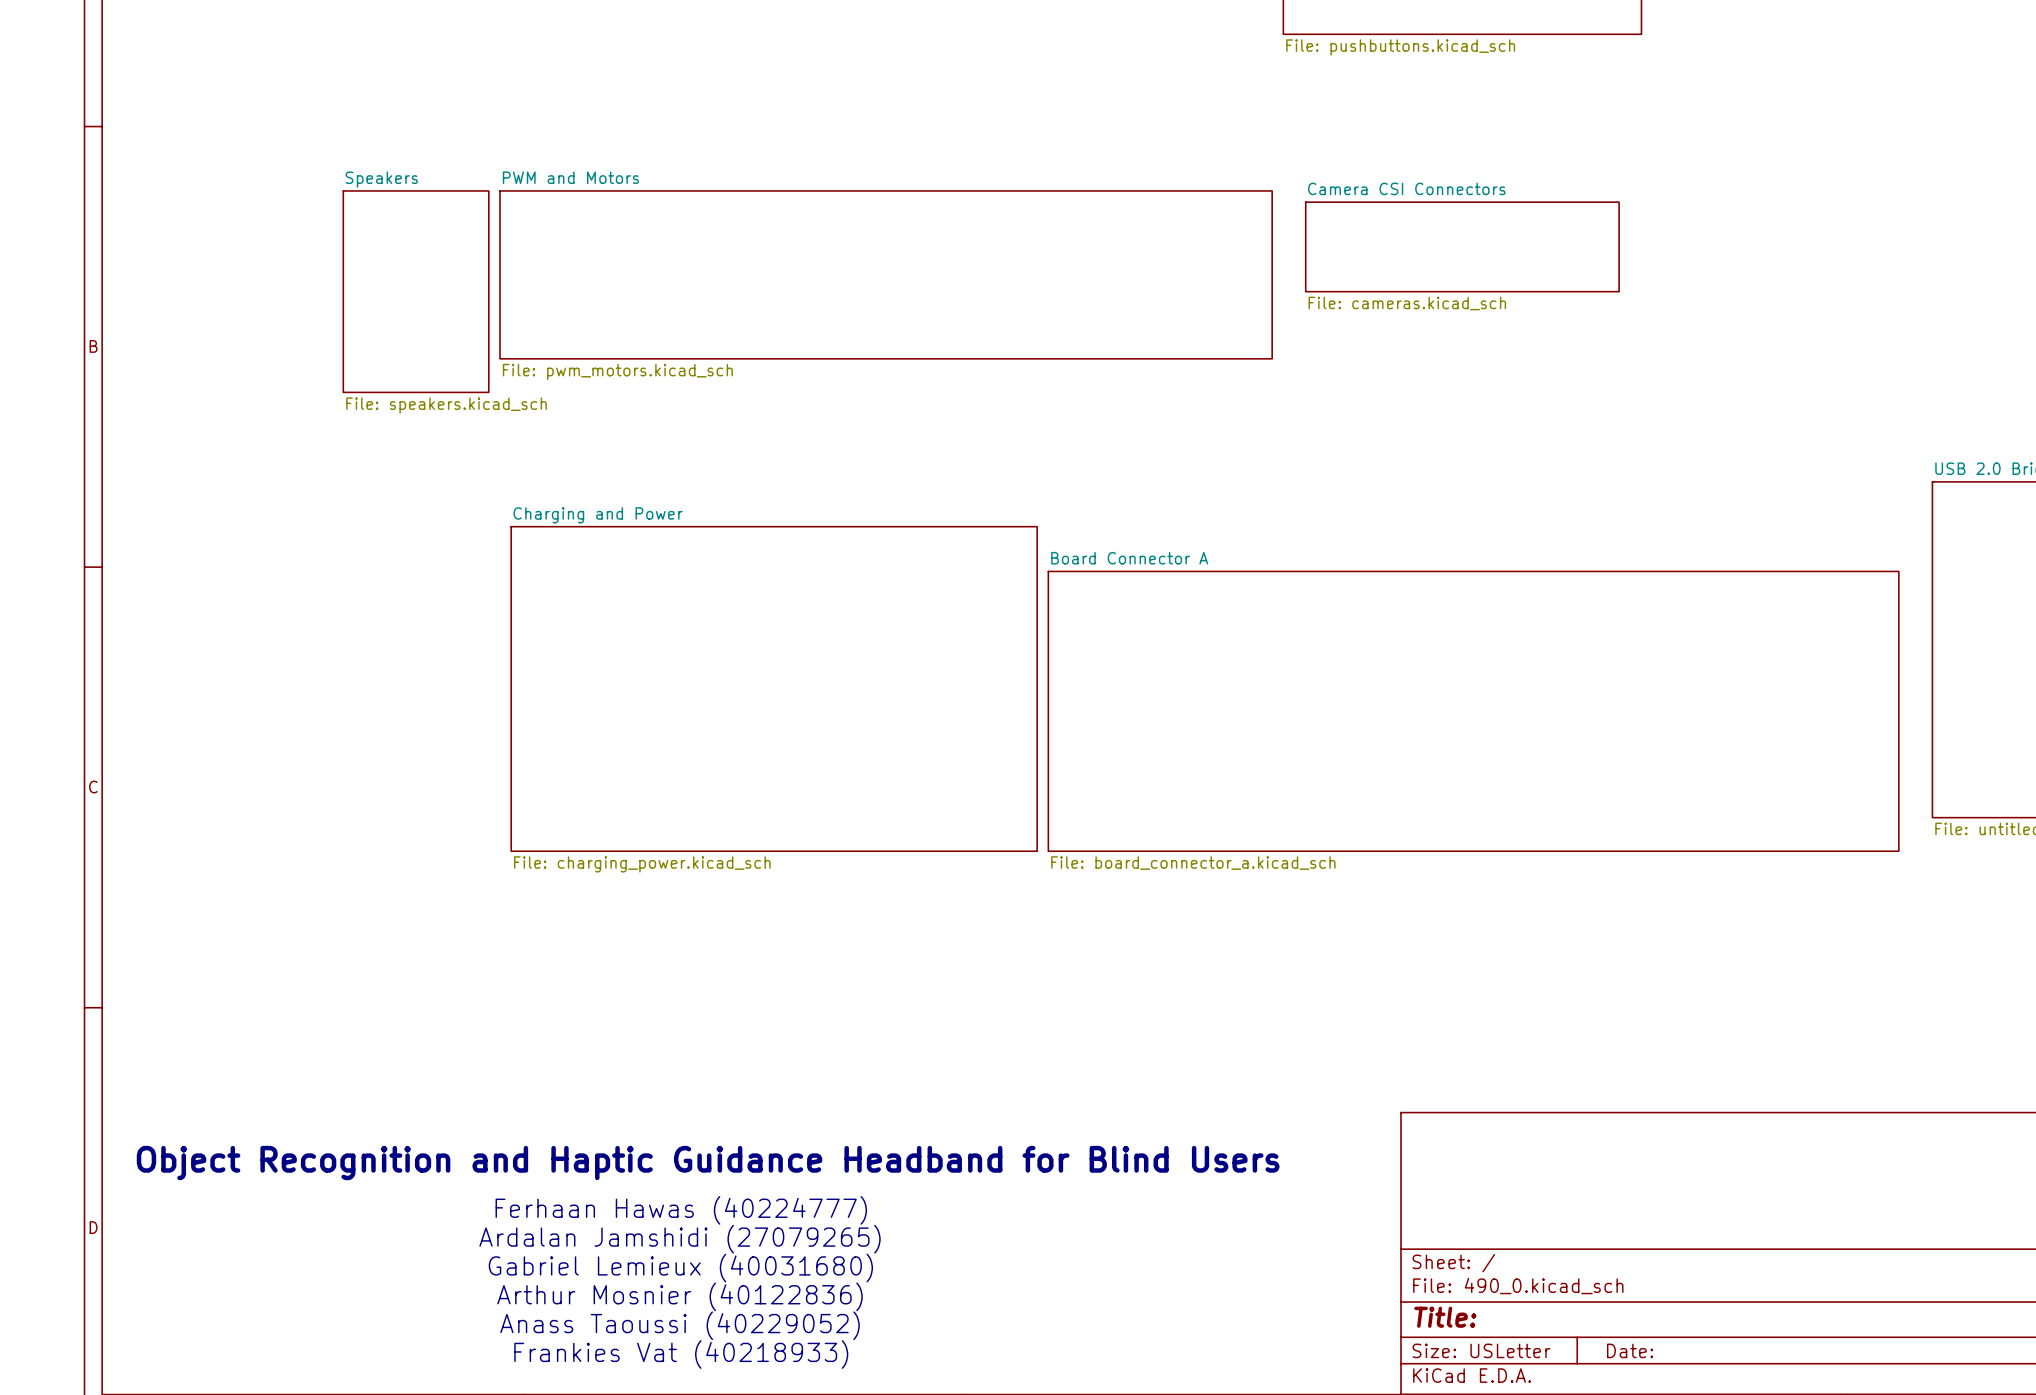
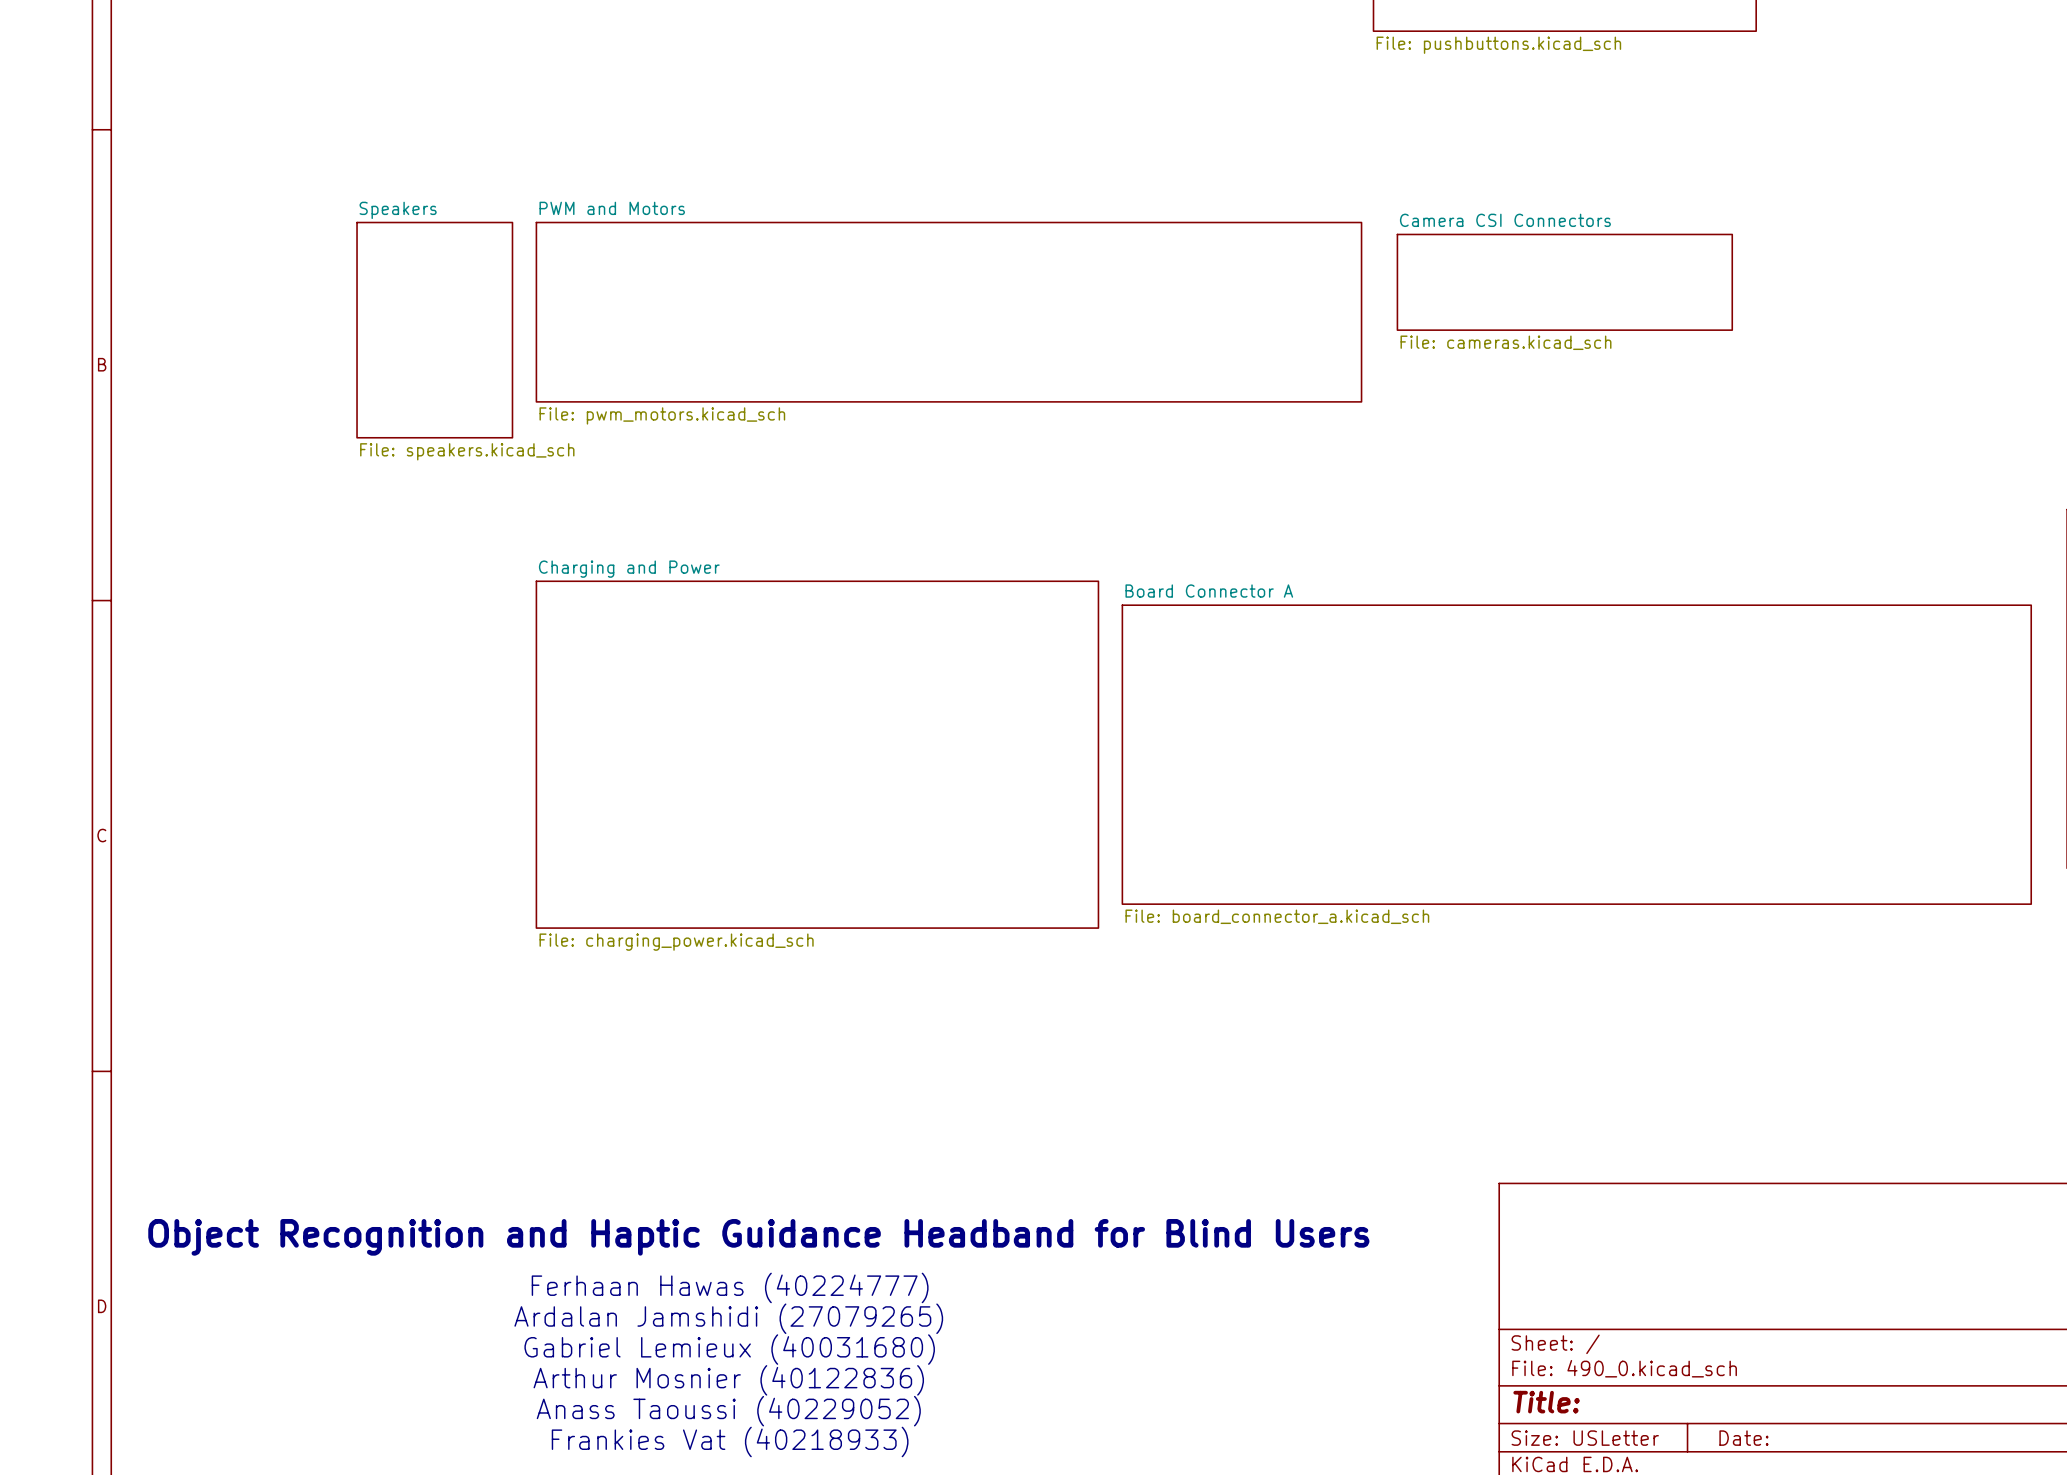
sheet Camera CSI Connectors position: (1462, 246) -> (1564, 282)
sheet PWM and Motors position: (886, 274) -> (948, 312)
sheet Speakers position: (416, 291) -> (434, 330)
sheet Charging and Power position: (774, 688) -> (817, 754)

